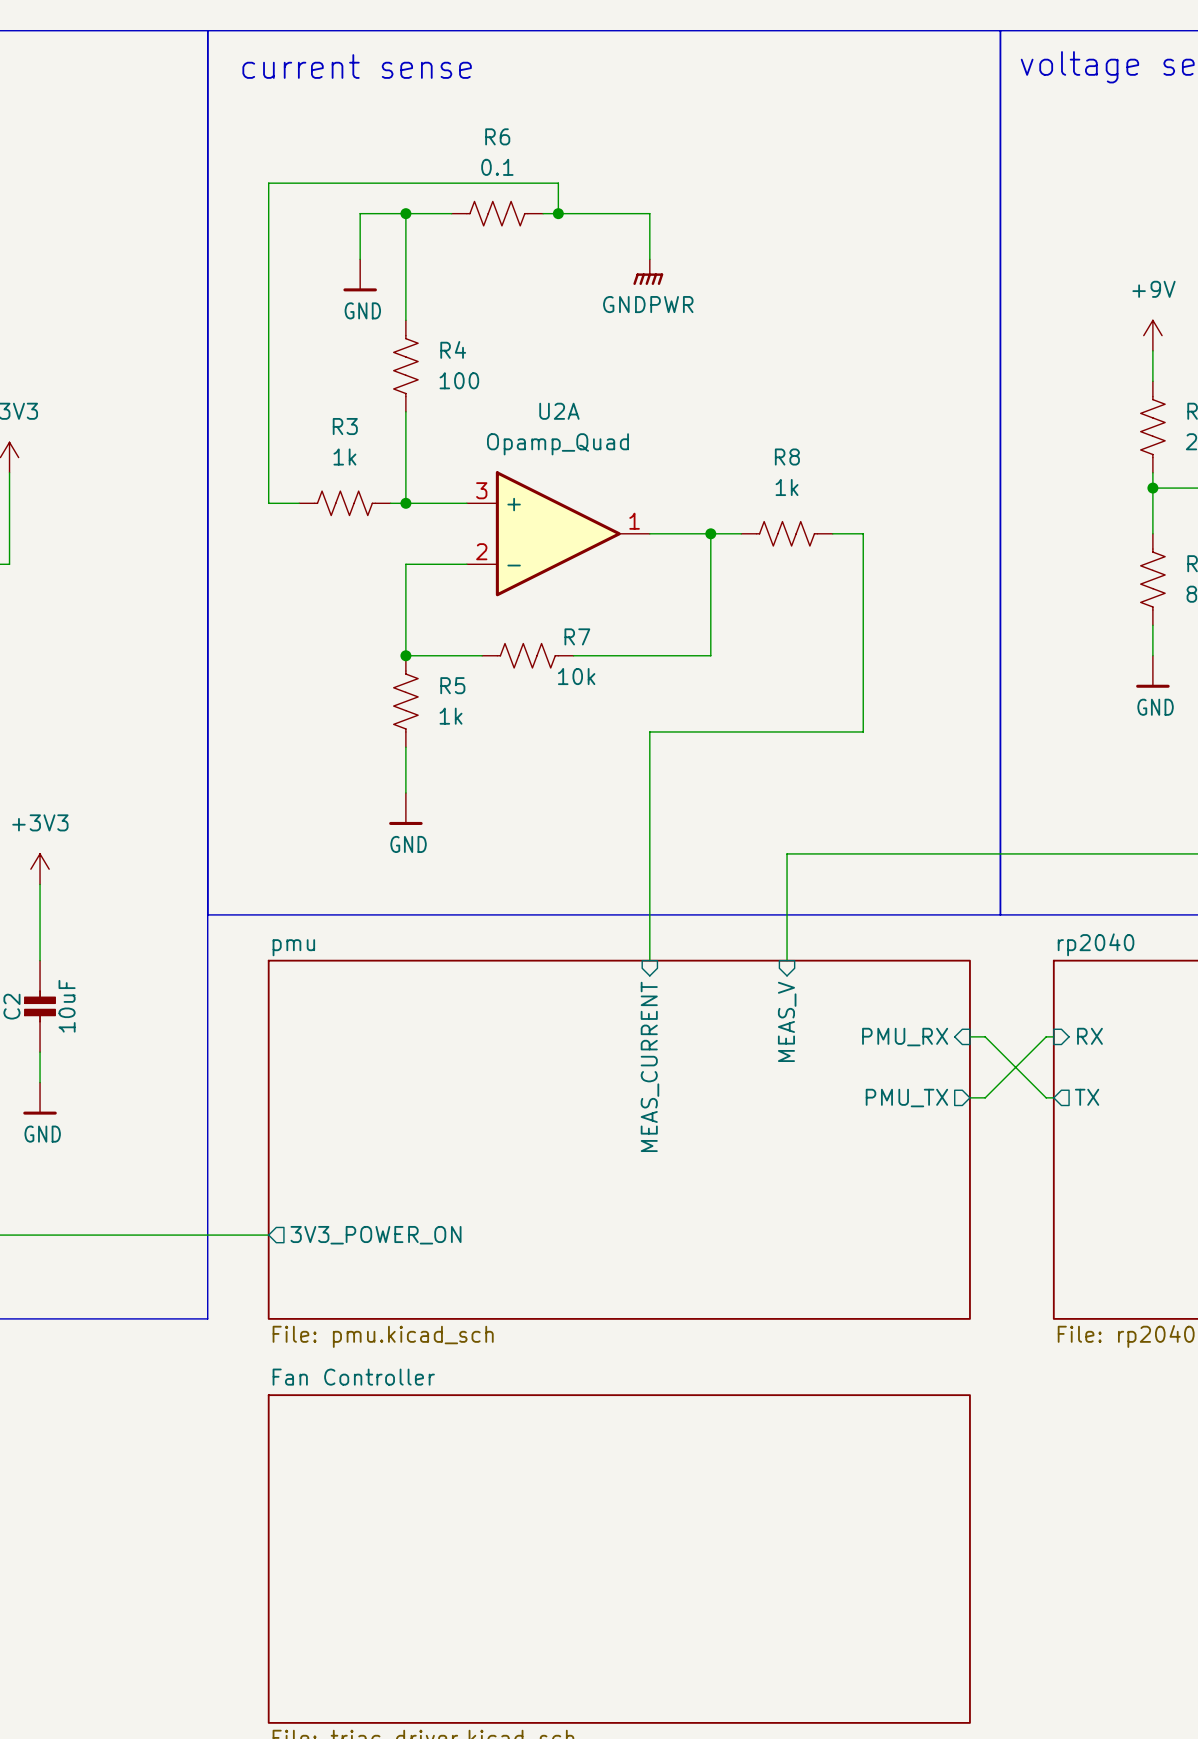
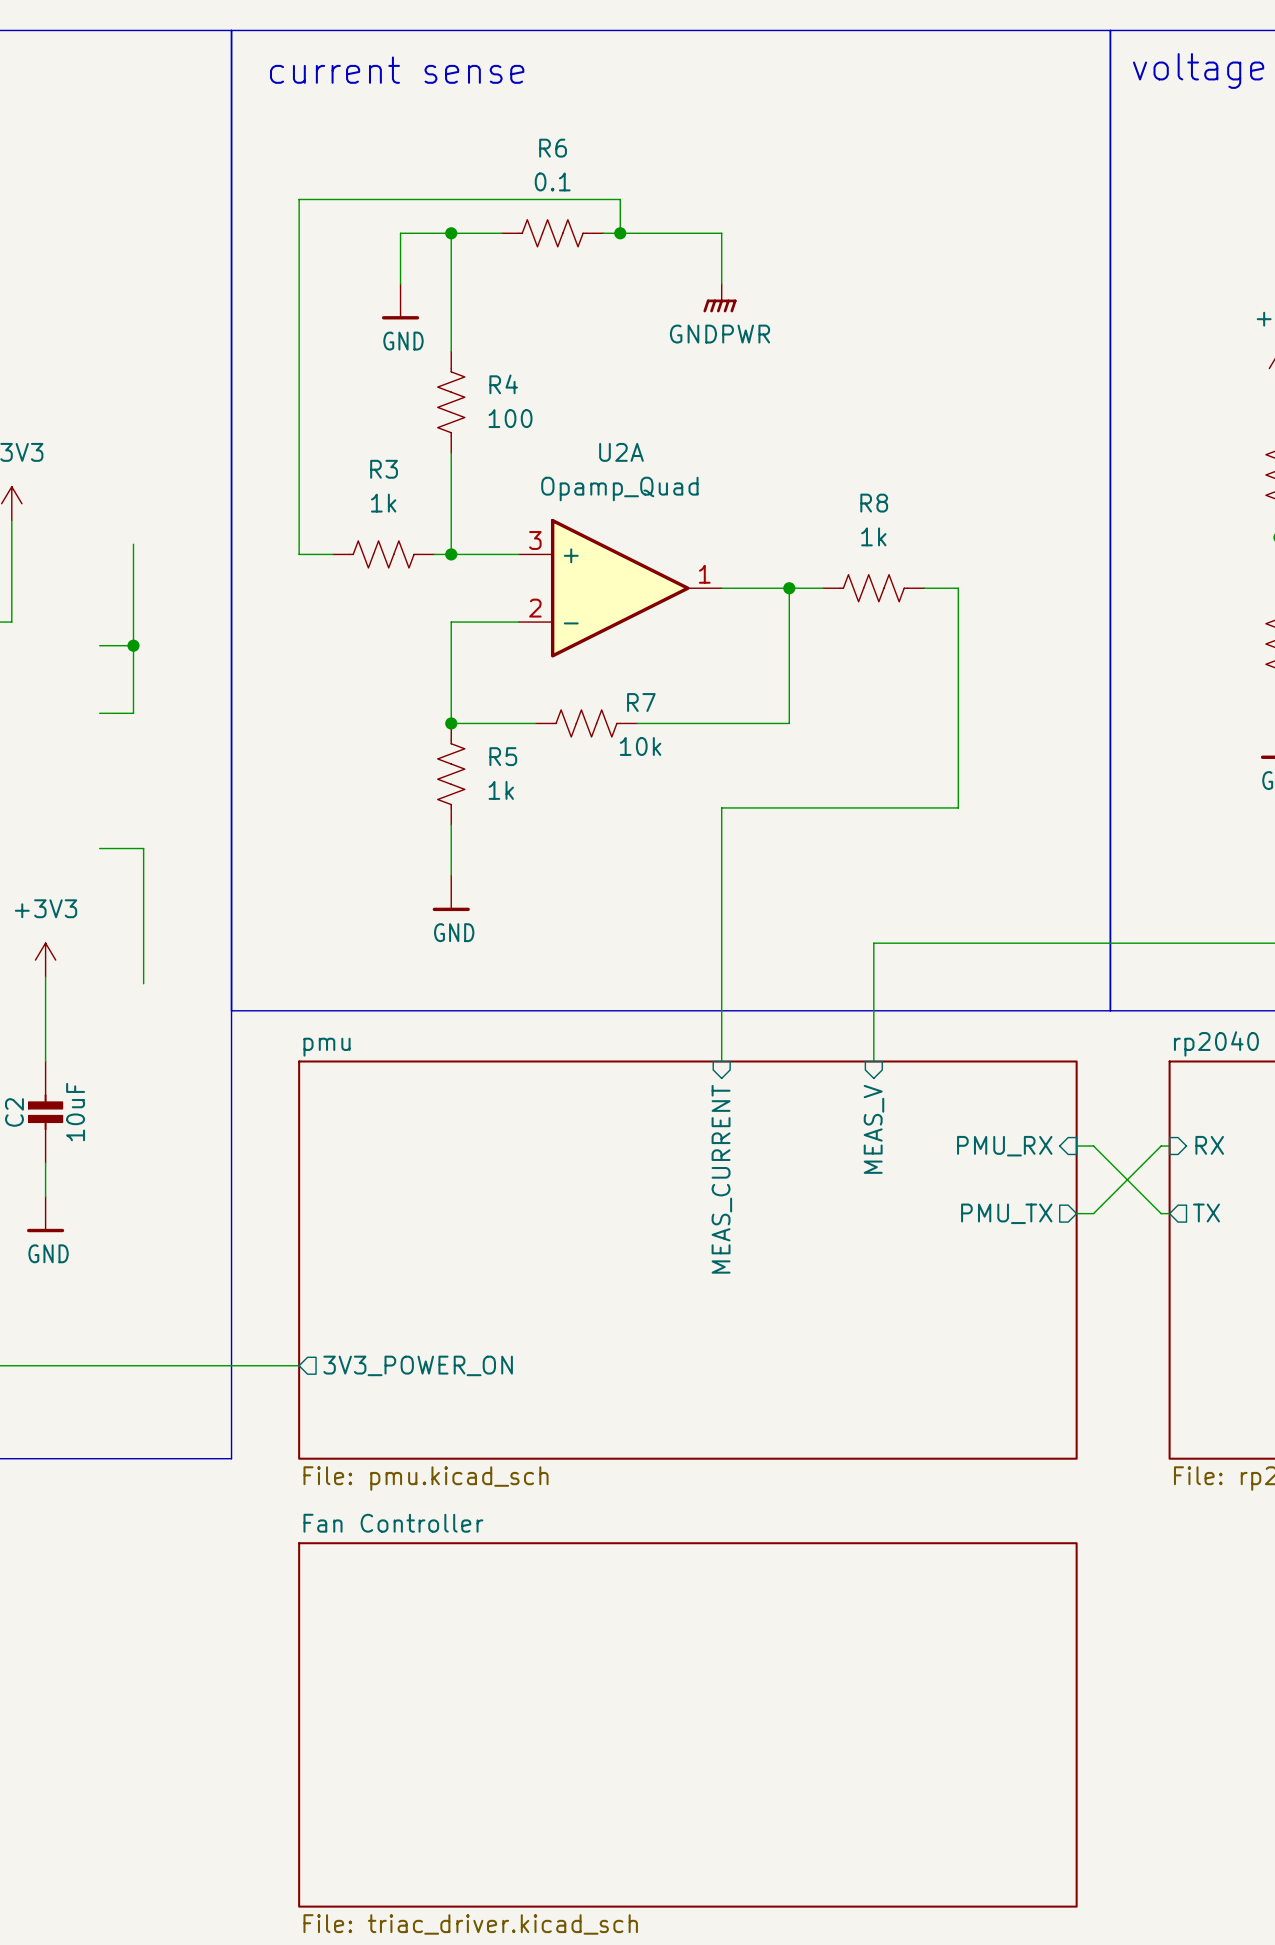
wire: none -> (133, 544) (133, 713) (99, 713)
wire: none -> (99, 645) (133, 645)
junction: none -> (133, 645)
wire: none -> (99, 848) (143, 848) (143, 983)

